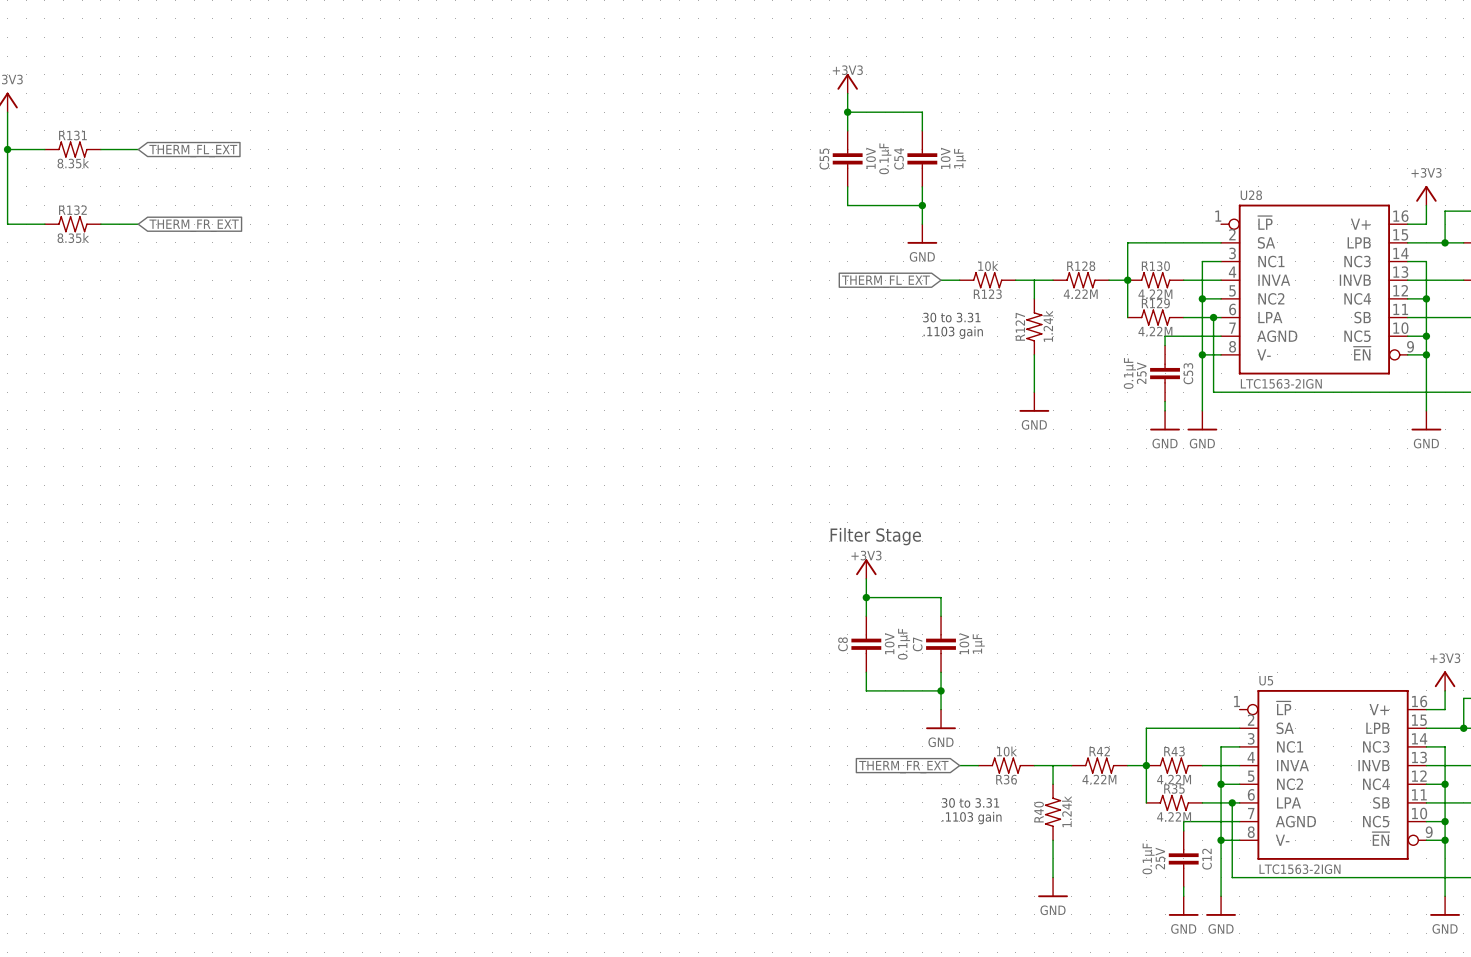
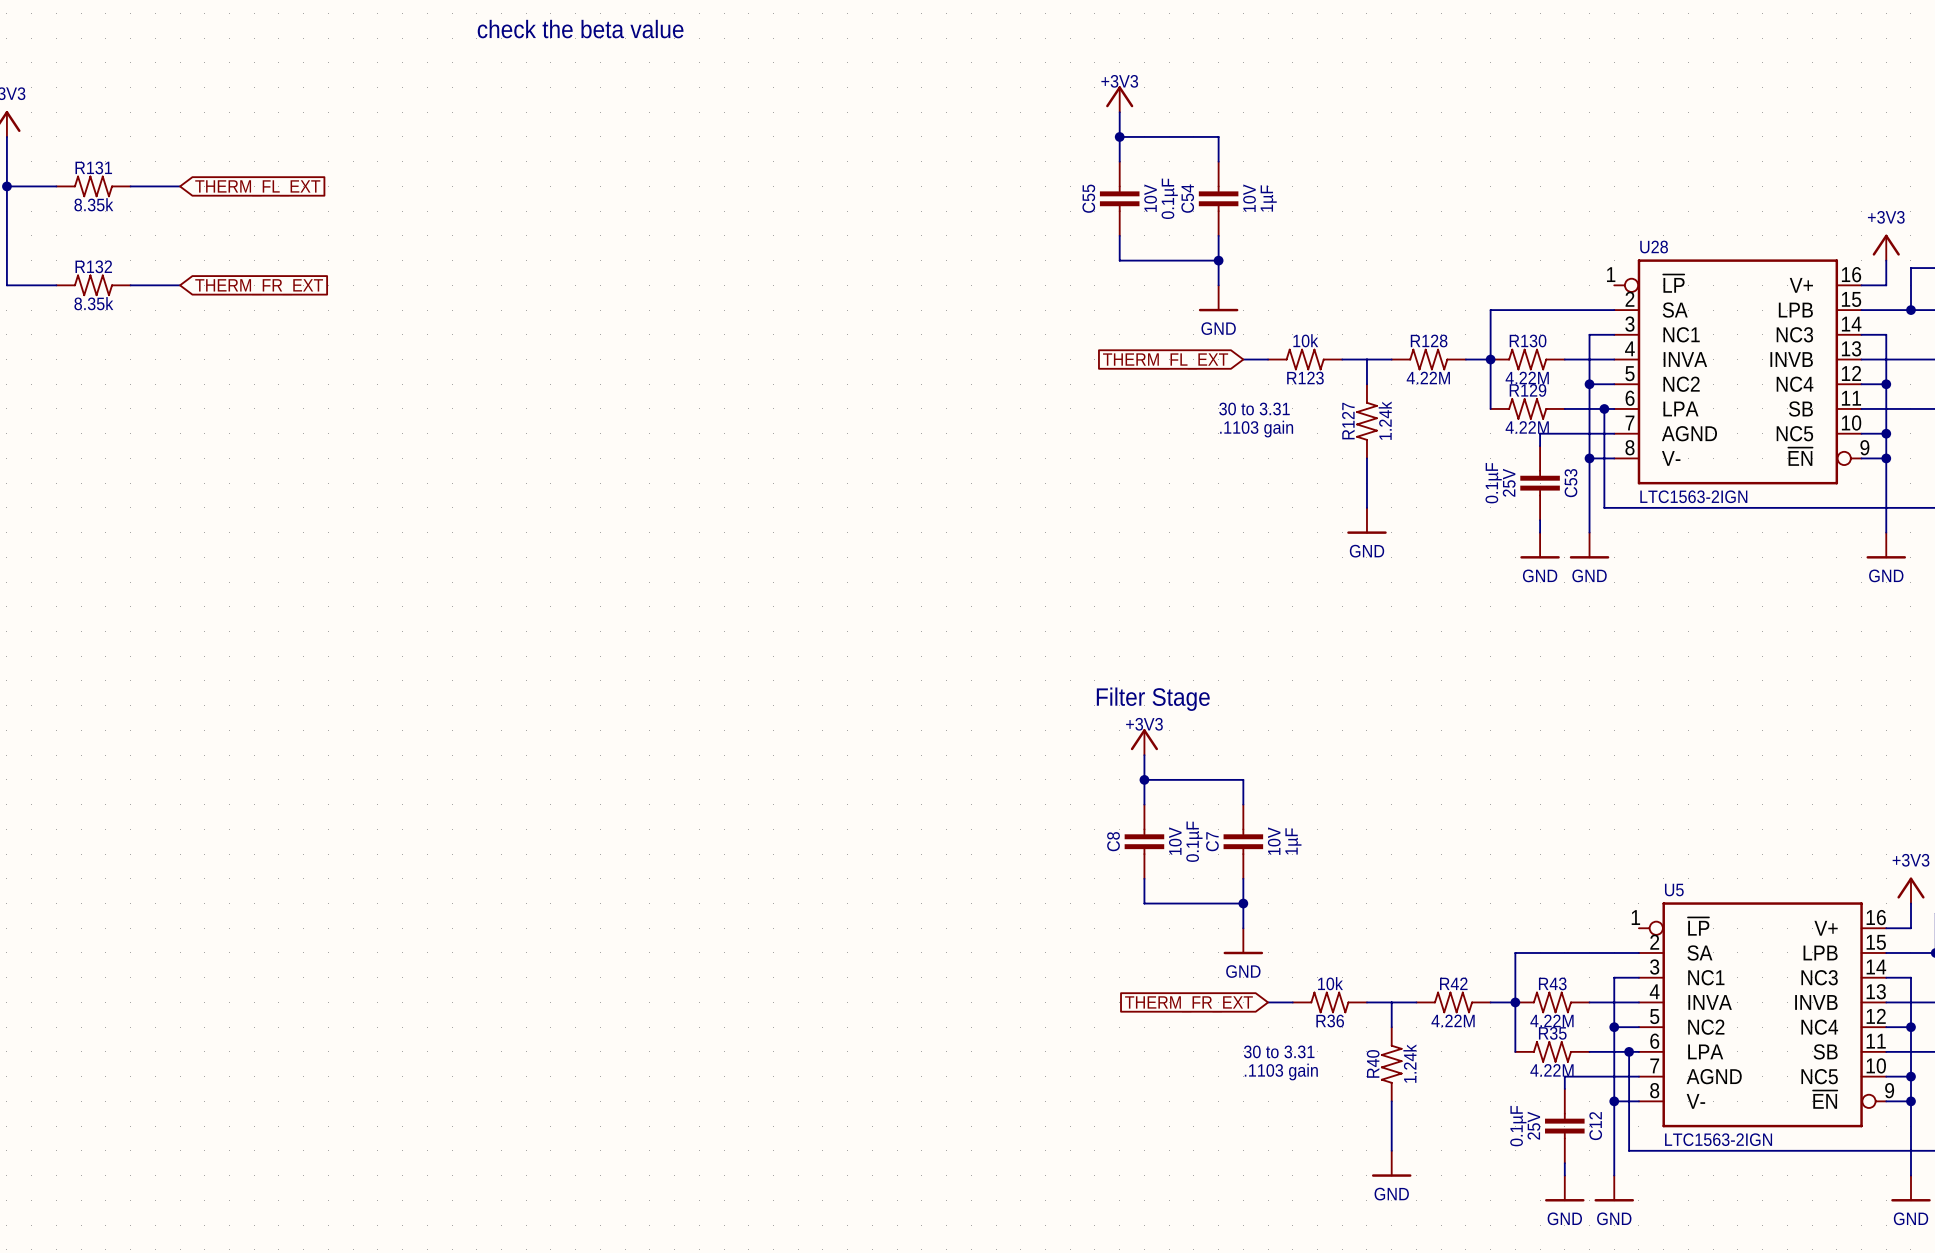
text: none -> check the beta value (580, 29)

